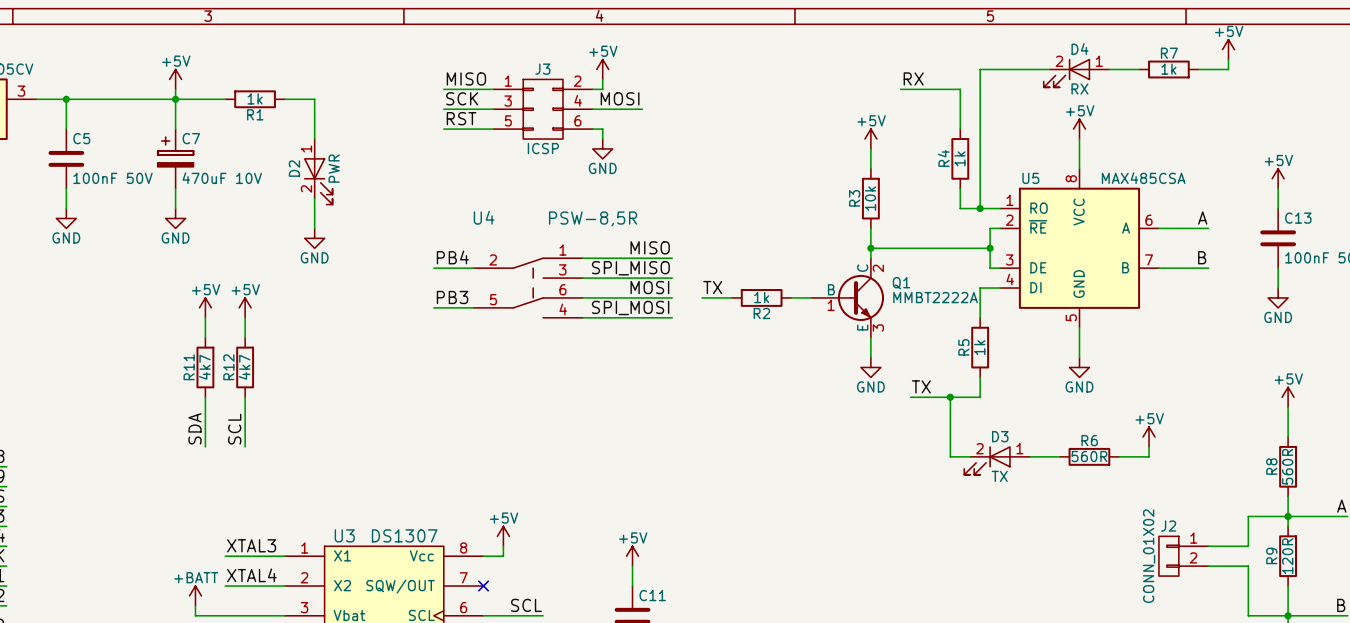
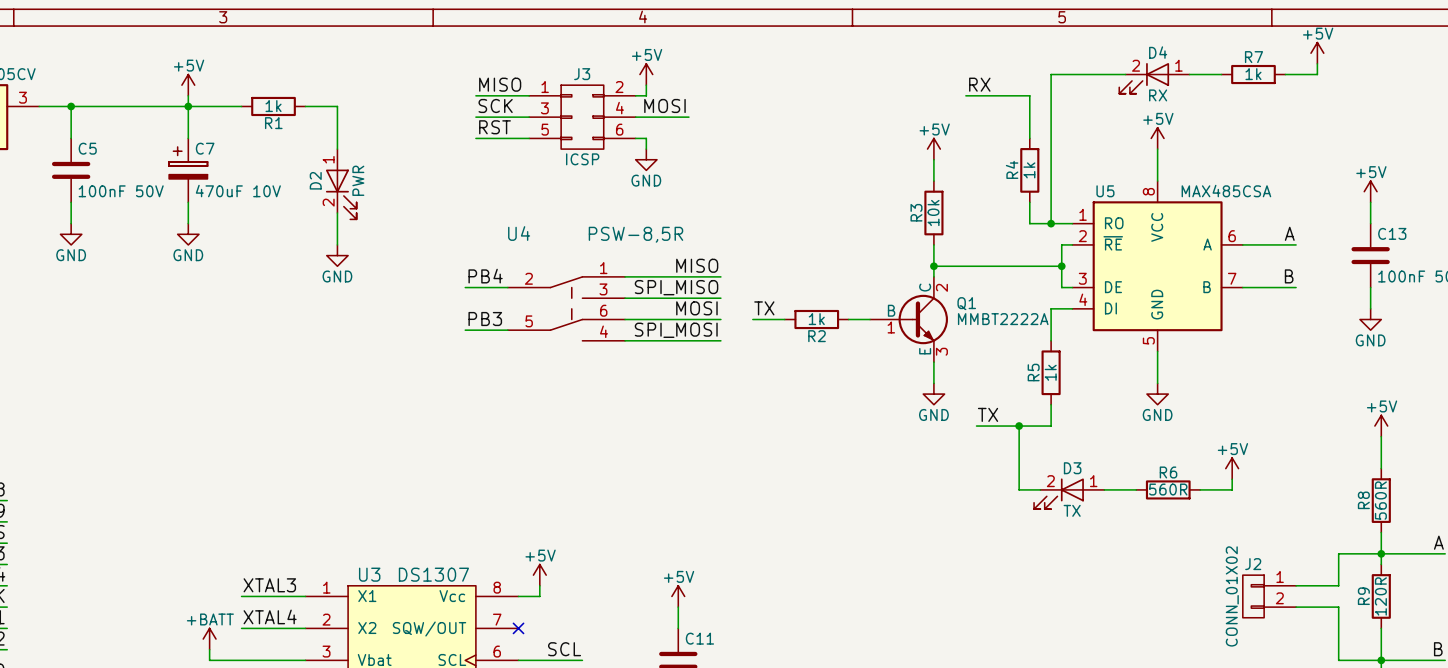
power symbol: +5V (205, 307) -> none
power symbol: +5V (245, 307) -> none
wire: (205, 317) (205, 337) -> none
wire: (245, 317) (245, 337) -> none
R11: 4k7 (205, 367) -> none
R12: 4k7 (245, 367) -> none
wire: (205, 397) (205, 446) -> none
wire: (245, 397) (245, 446) -> none
label: SDA (195, 428) -> none
label: SCL (234, 429) -> none

